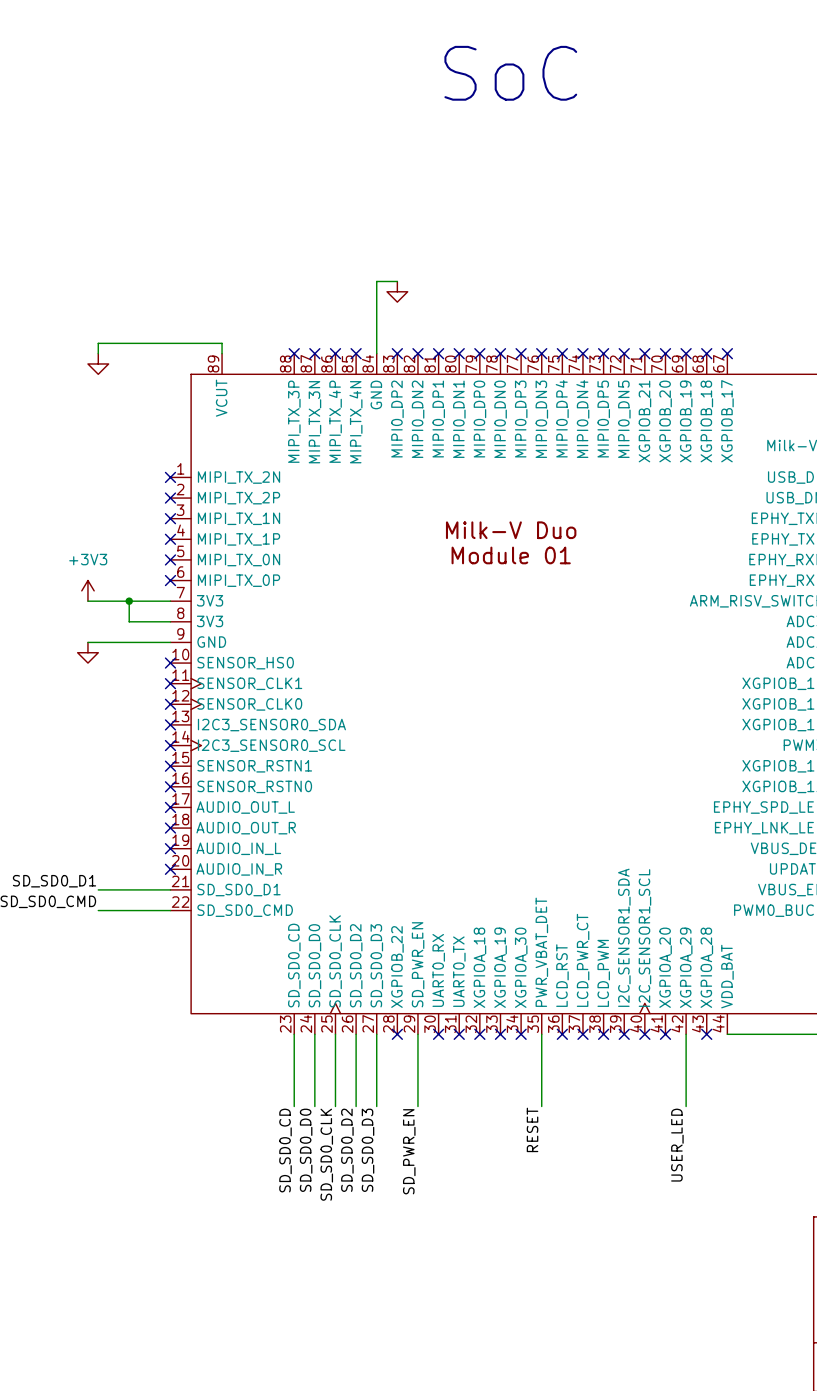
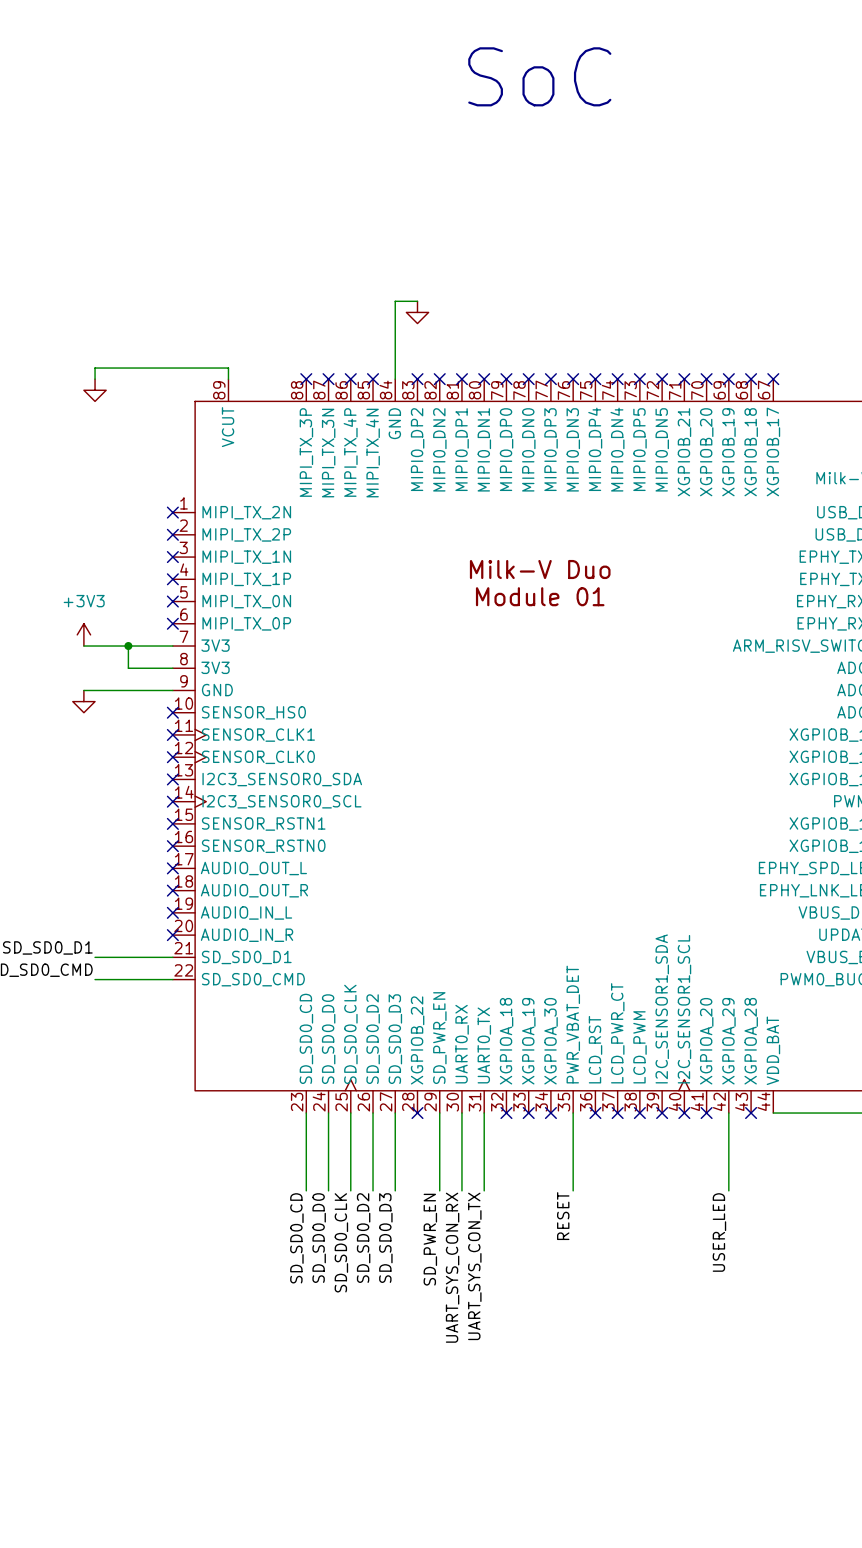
wire: none -> (461, 1113) (461, 1190)
no-connect mark: (438, 1034) -> none
wire: none -> (484, 1113) (484, 1190)
no-connect mark: (459, 1034) -> none
label: none -> UART_SYS_CON_TX (474, 1266)
label: none -> UART_SYS_CON_RX (452, 1267)

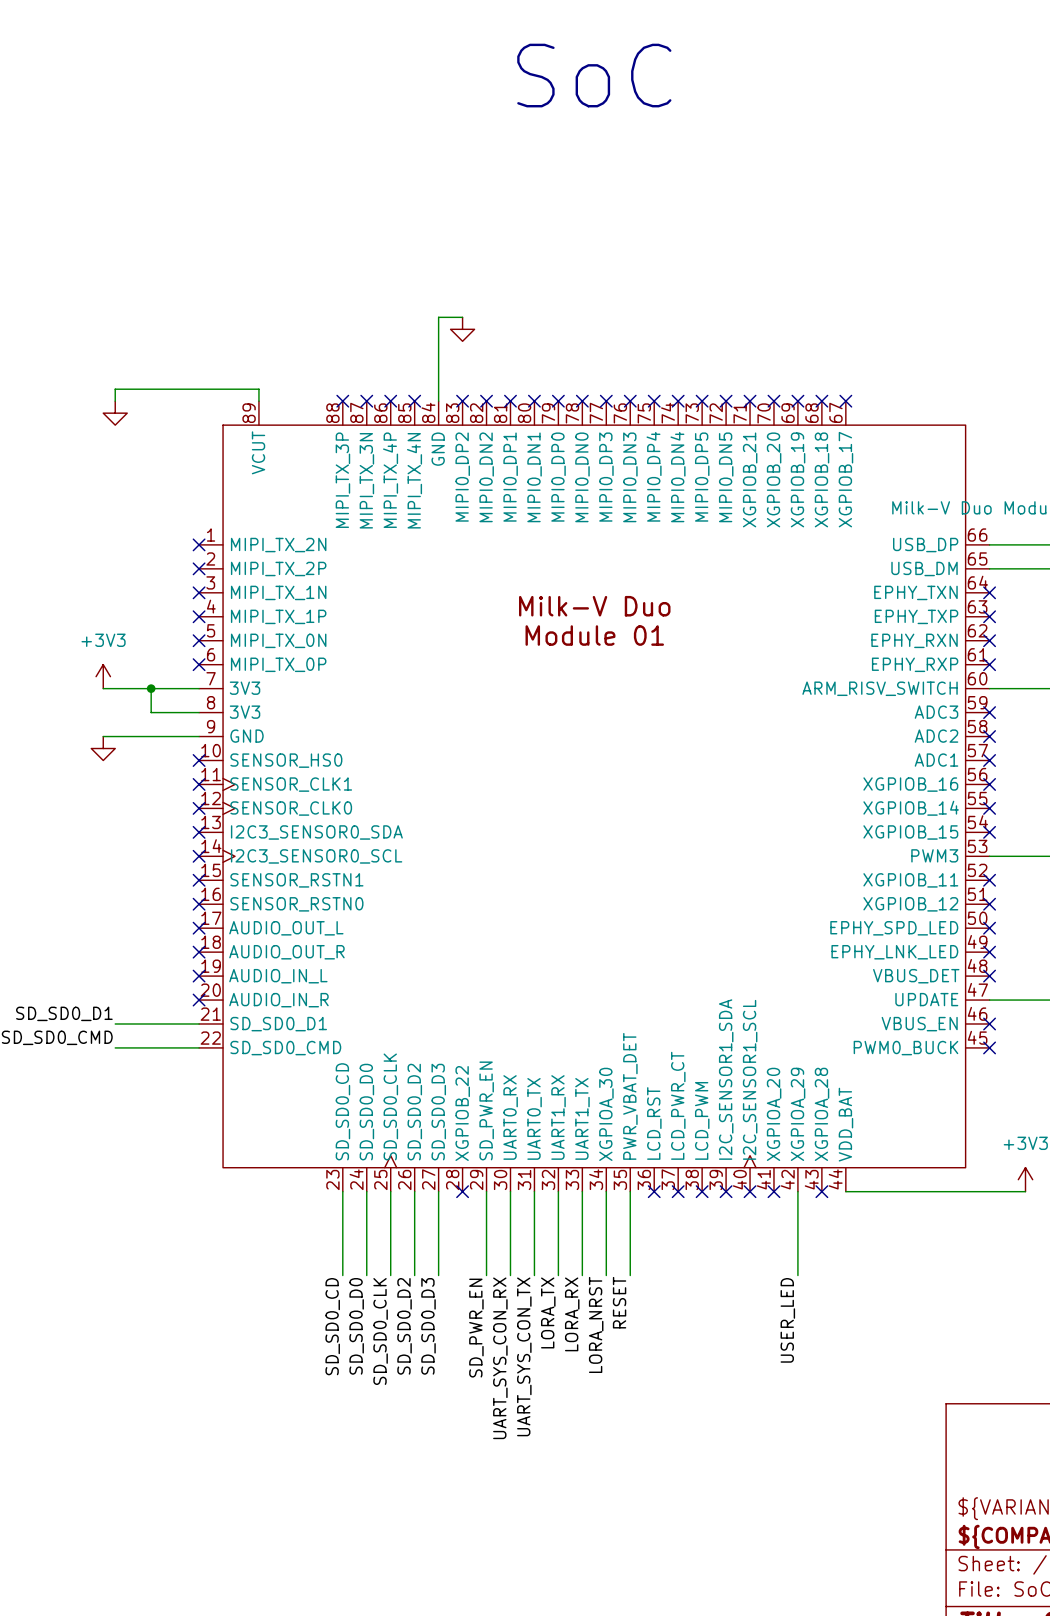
part pin name: XGPIOA_18 (506, 1041) -> UART1_RX (558, 1117)
part pin name: XGPIOA_19 (528, 1041) -> UART1_TX (582, 1118)
wire: none -> (558, 1191) (558, 1275)
no-connect mark: (506, 1113) -> none
wire: none -> (582, 1191) (582, 1275)
no-connect mark: (528, 1113) -> none
wire: none -> (606, 1191) (606, 1275)
no-connect mark: (550, 1113) -> none
label: none -> LORA_TX (548, 1312)
label: none -> LORA_RX (572, 1314)
label: none -> LORA_NRST (596, 1324)

